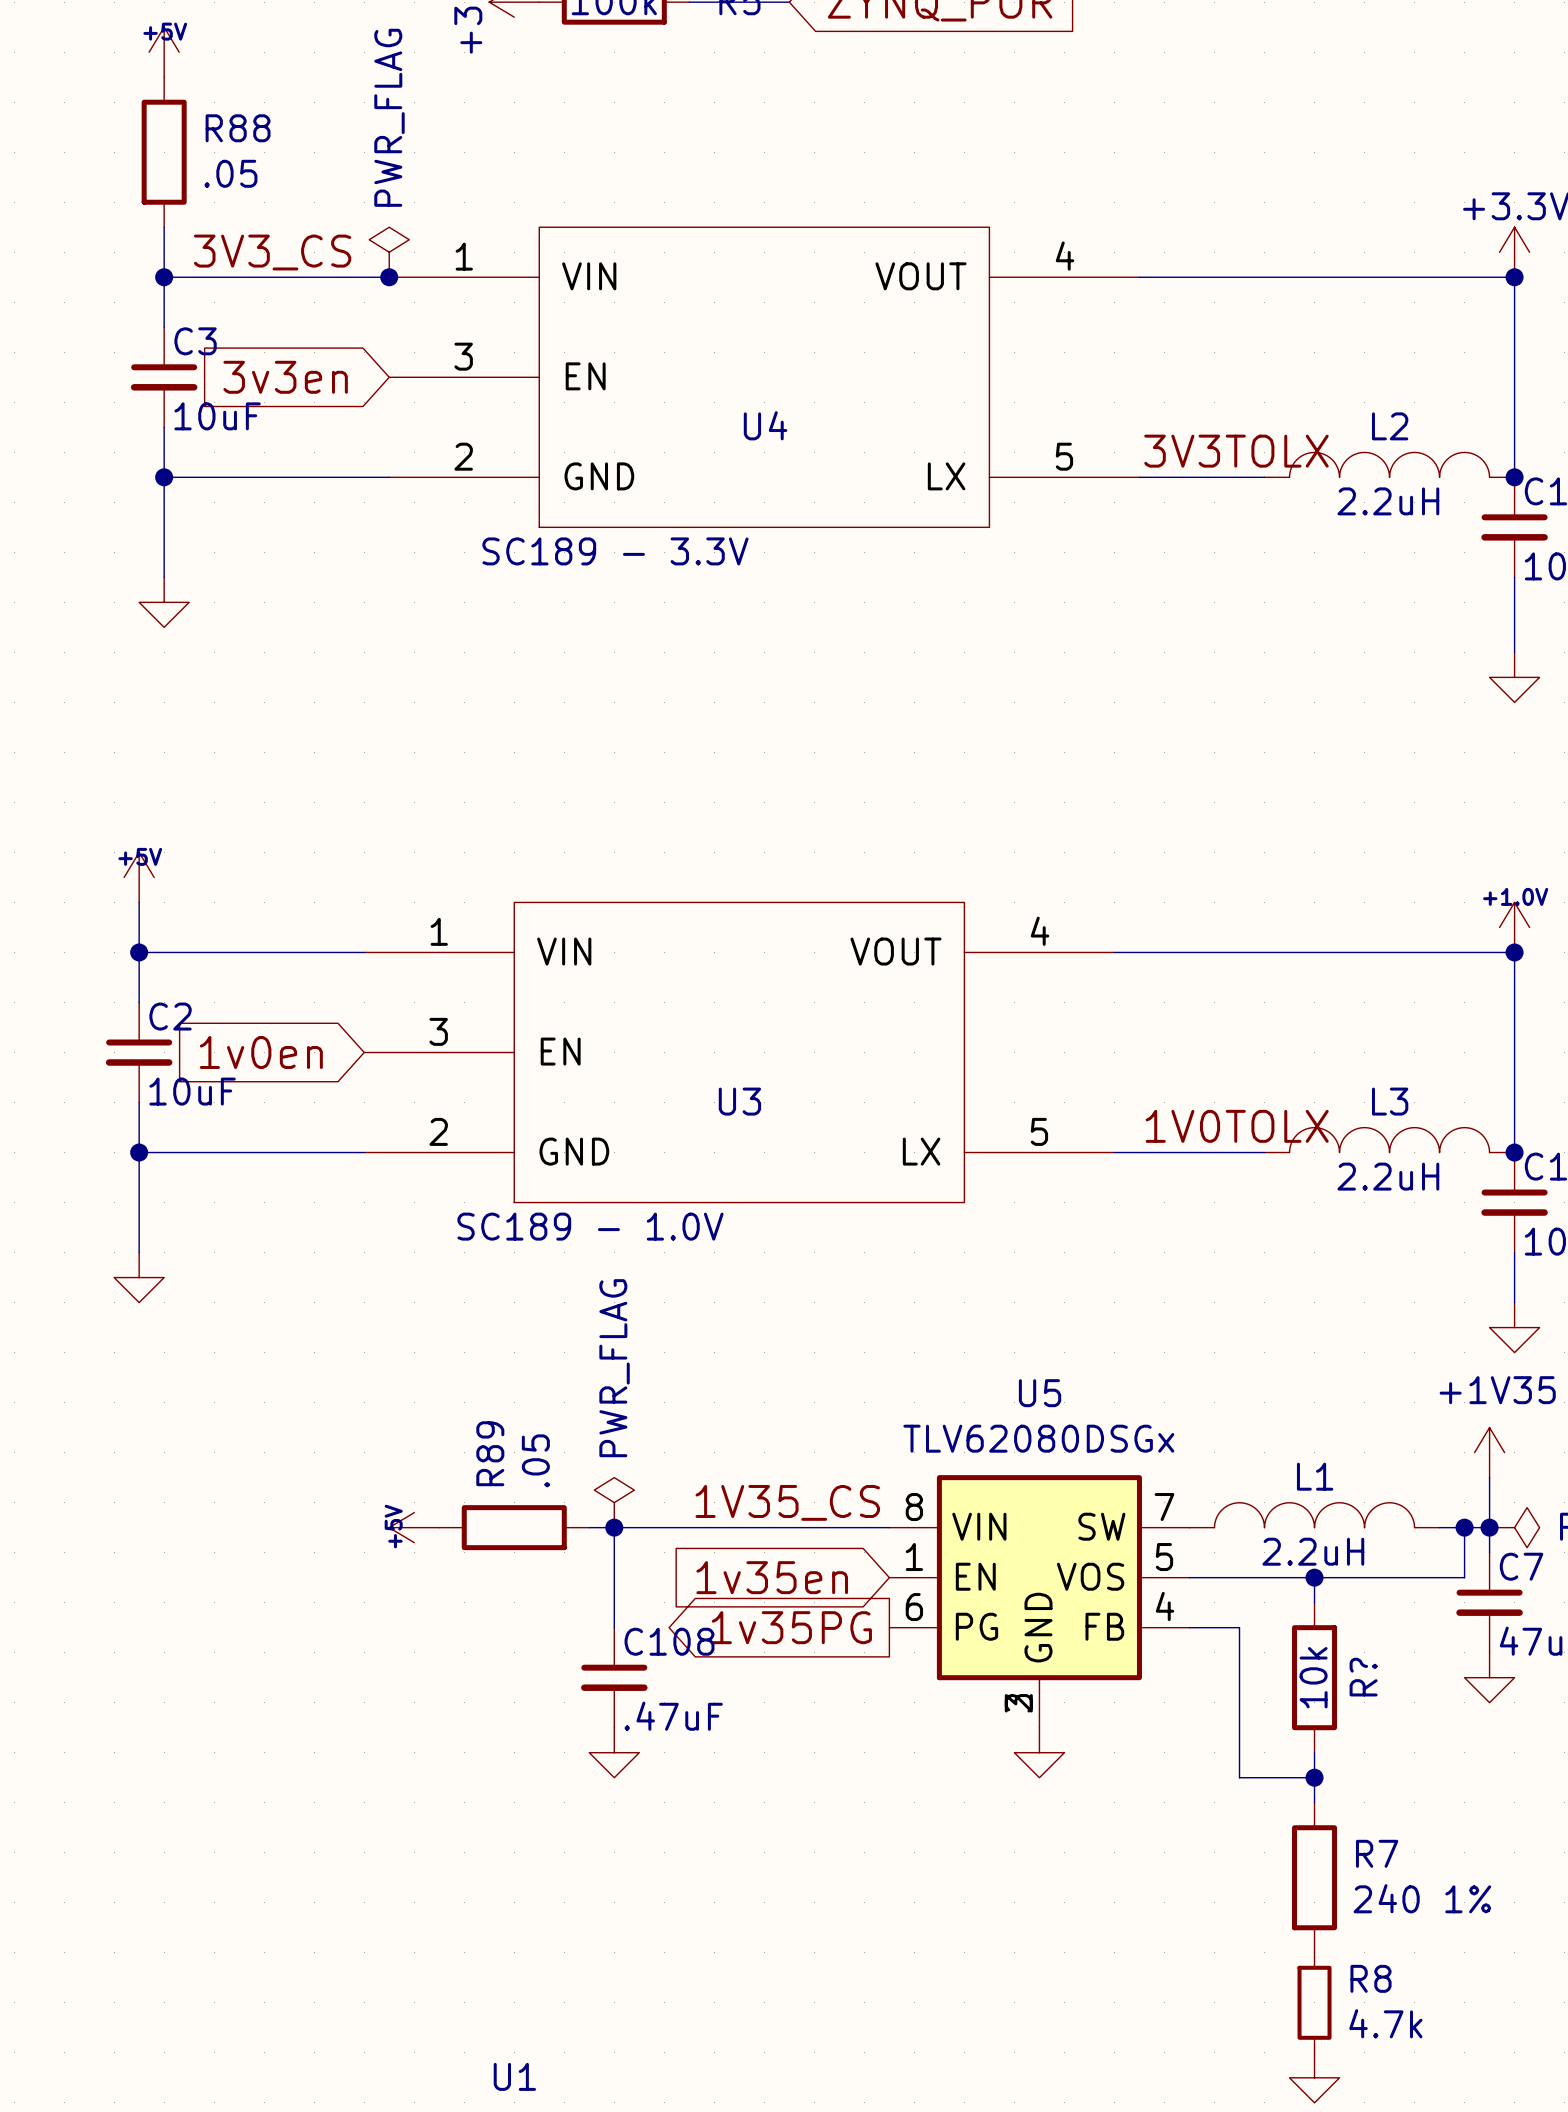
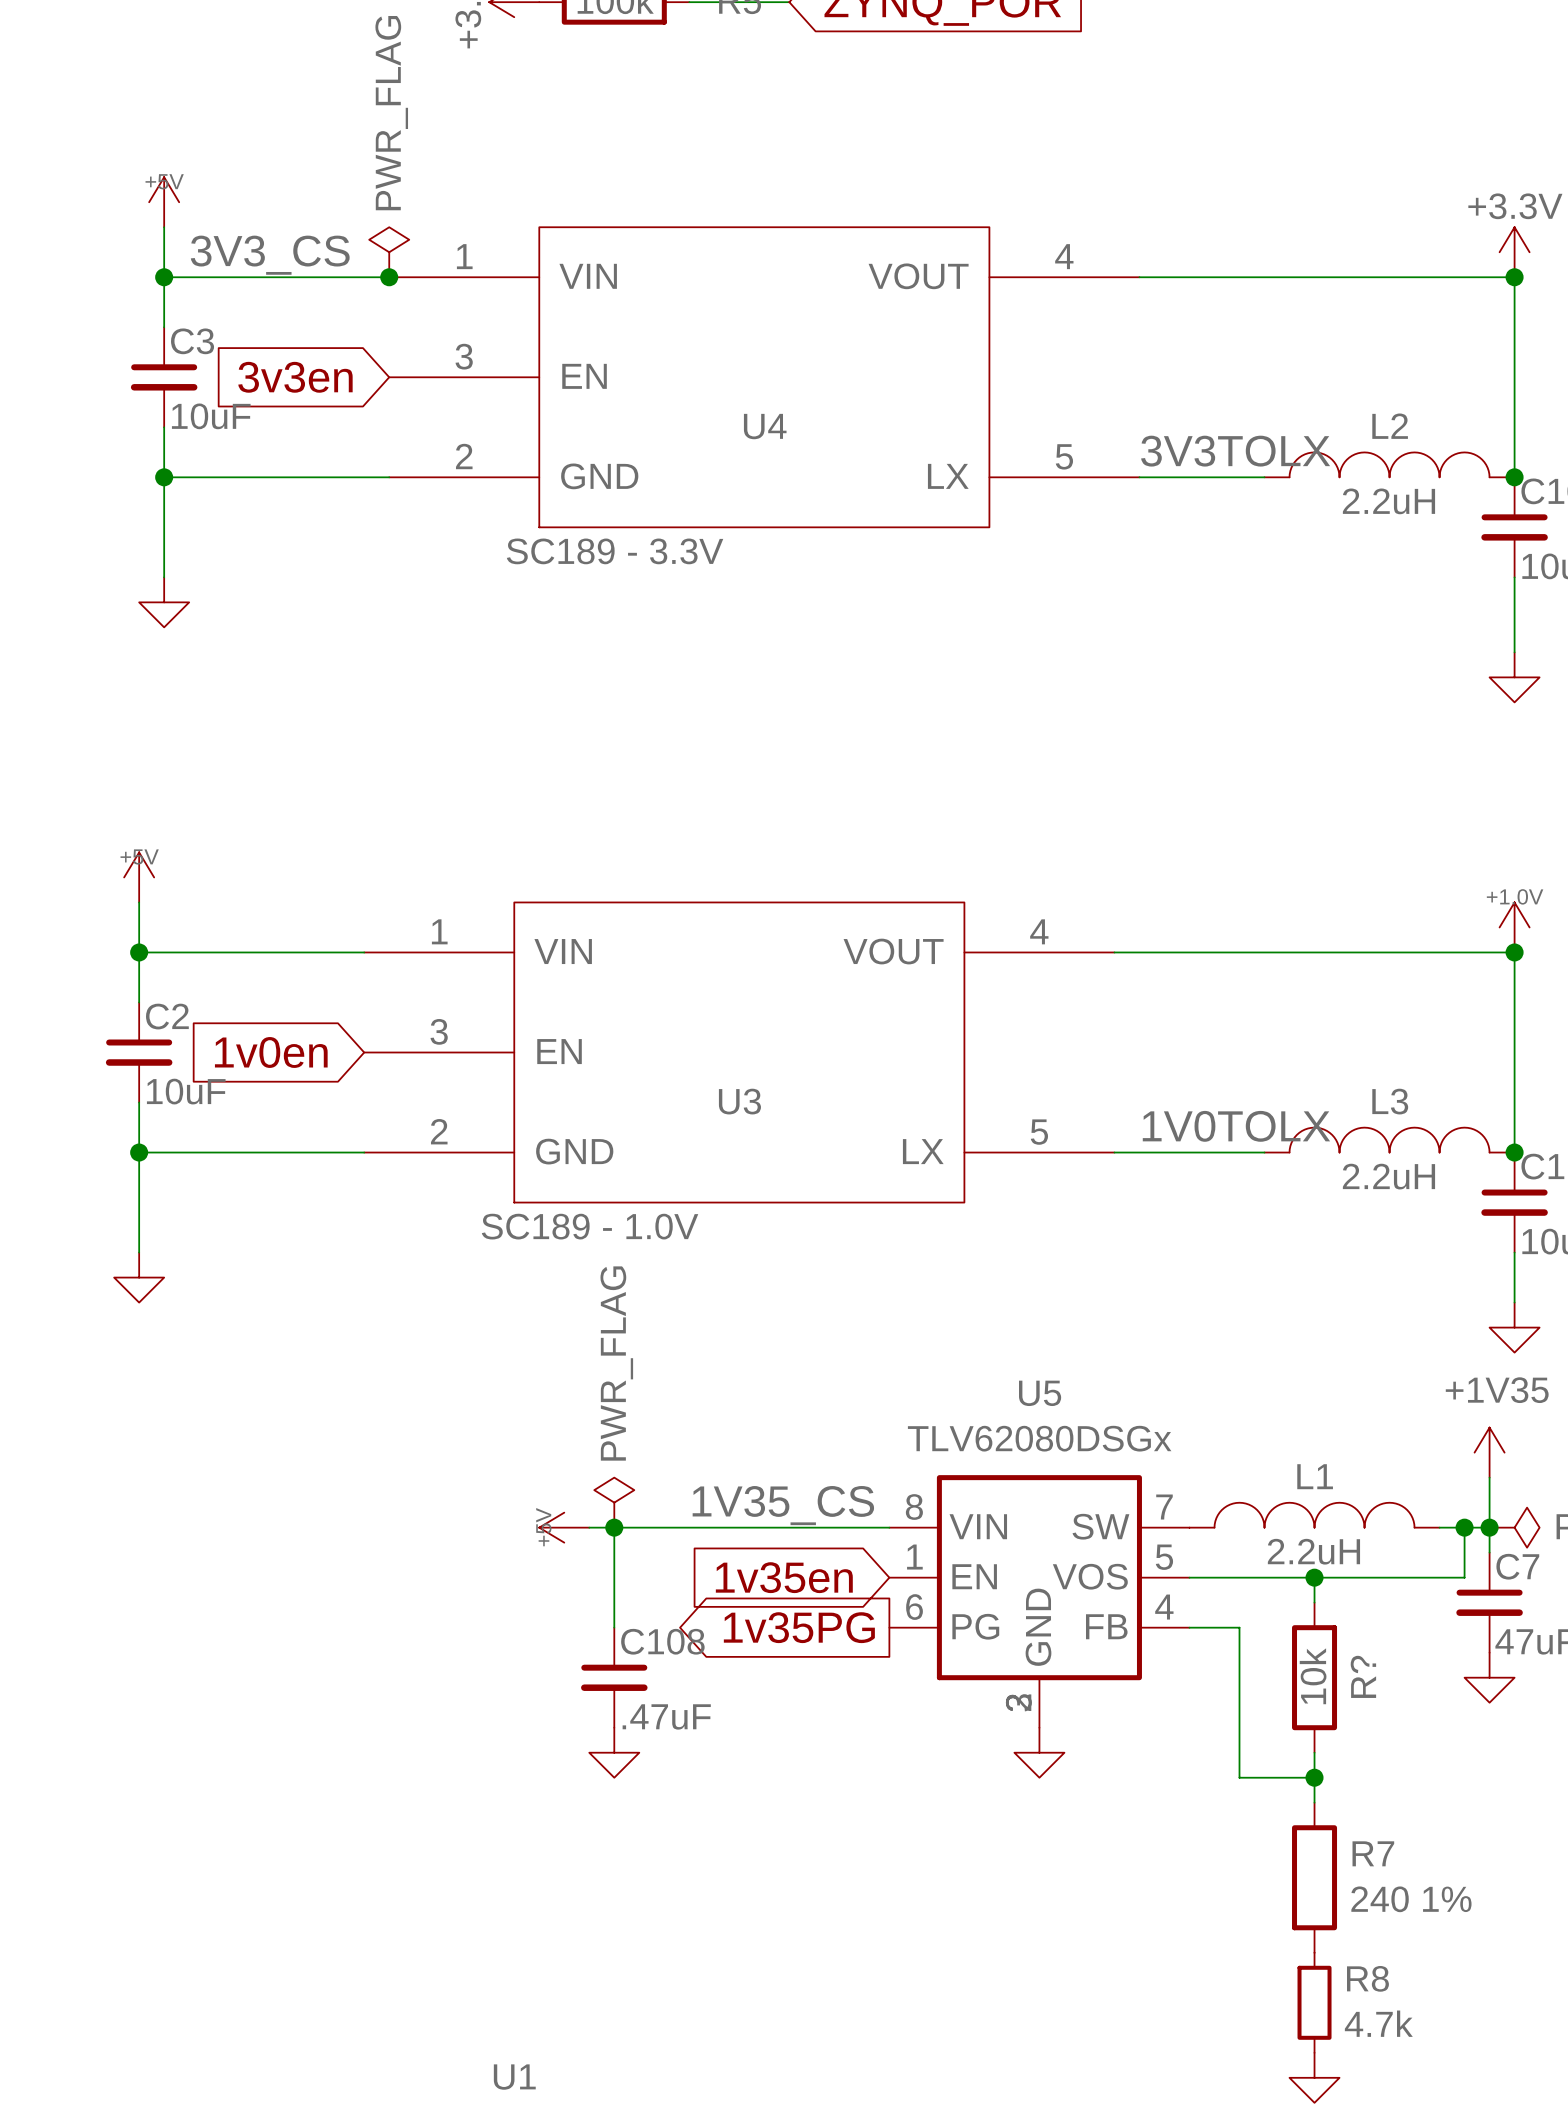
power symbol position: +5V (164, 52) -> +5V (164, 202)
R88: .05 (164, 152) -> none
power symbol position: +5V (414, 1527) -> +5V (564, 1527)
R89: .05 (514, 1527) -> none

